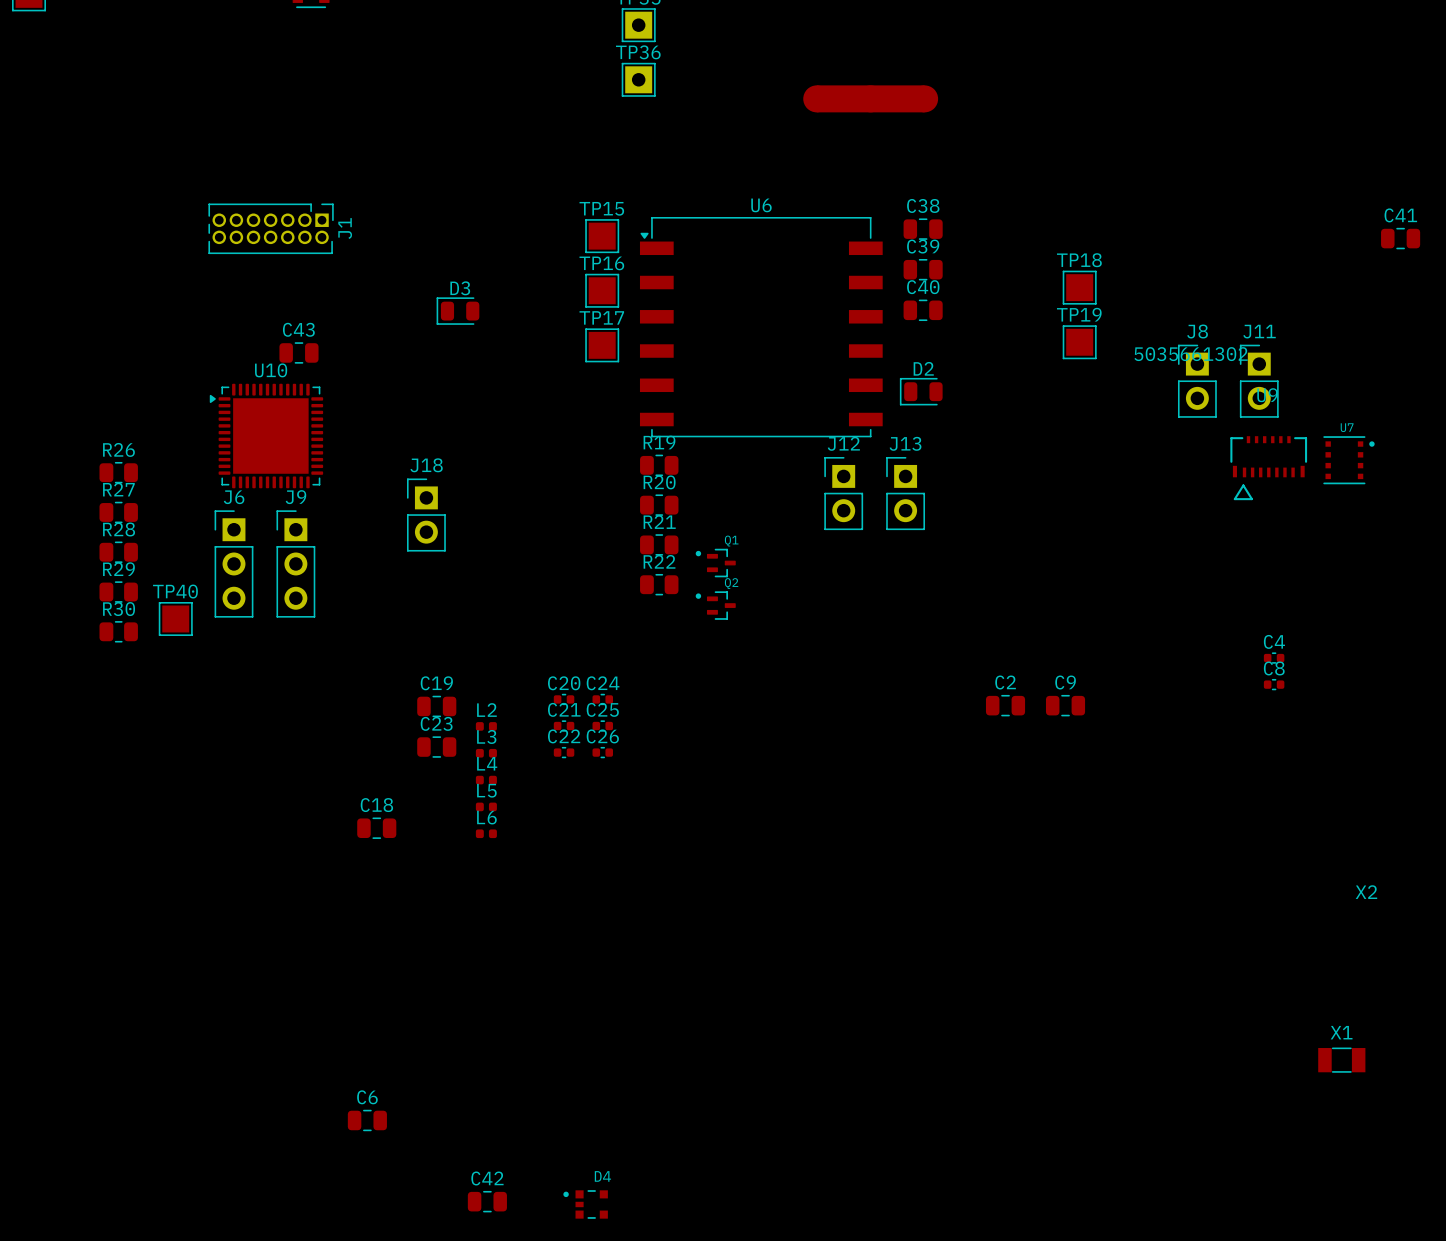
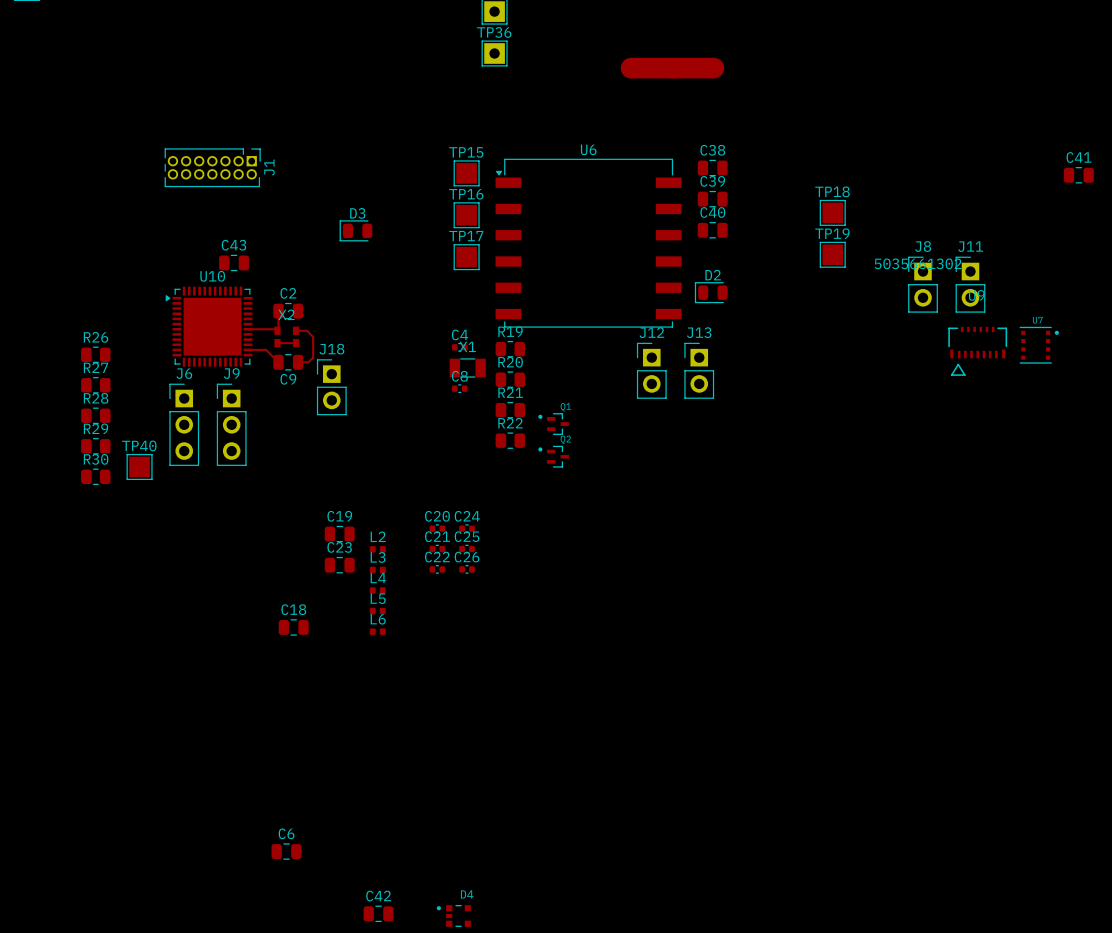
track: none -> (278, 311) (277, 330) (248, 329)
track: none -> (296, 330) (306, 330) (313, 336) (313, 357) (308, 362) (298, 362)
track: none -> (277, 343) (296, 343)
track: none -> (248, 349) (266, 349) (278, 362)
C4 position: (1274, 658) -> (459, 347)
C9 name position: C9 (1065, 682) -> C9 (288, 379)
C8 position: (1274, 684) -> (459, 388)
C2 position: (1005, 705) -> (288, 311)
C9 position: (1065, 705) -> (288, 362)
X2 footprint: [1355, 885, 1378, 899] -> [274, 326, 300, 348]
X2 name position: X2 (1366, 892) -> X2 (286, 314)
X1 position: (1341, 1060) -> (467, 367)

